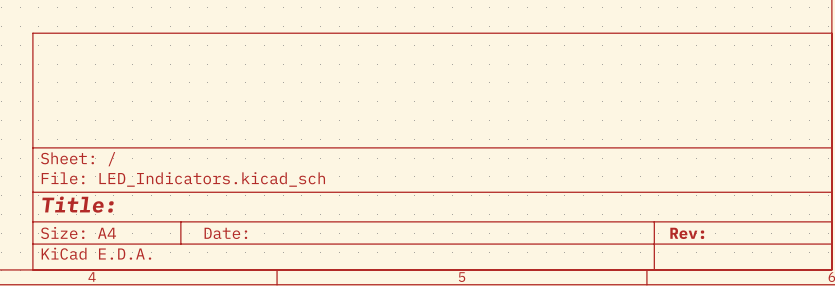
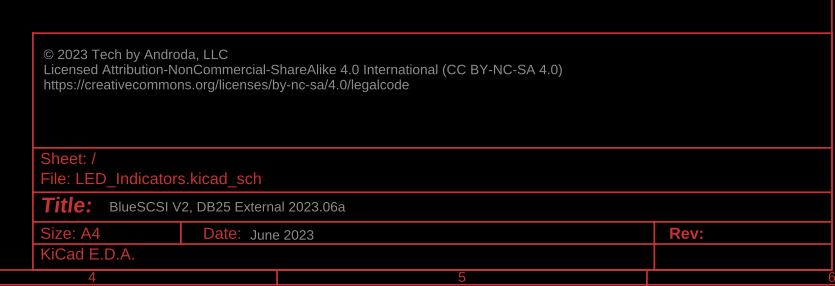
text: none -> © 2023 Tech by Androda, LLC (135, 55)
text: none -> Licensed Attribution-NonCommercial-ShareAlike 4.0 International (CC BY-NC-SA 4.0) (303, 70)
text: none -> https://creativecommons.org/licenses/by-nc-sa/4.0/legalcode (226, 85)
text: none -> BlueSCSI V2, DB25 External 2023.06a (227, 207)
text: none -> June 2023 (281, 234)

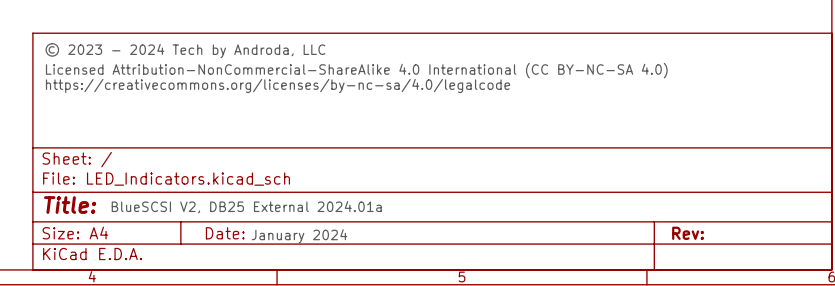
text: © 2023 Tech by Androda, LLC (135, 55) -> © 2023 - 2024 Tech by Androda, LLC (185, 50)
text: BlueSCSI V2, DB25 External 2023.06a (227, 207) -> BlueSCSI V2, DB25 External 2024.01a (246, 207)
text: June 2023 (281, 234) -> January 2024 (299, 236)

